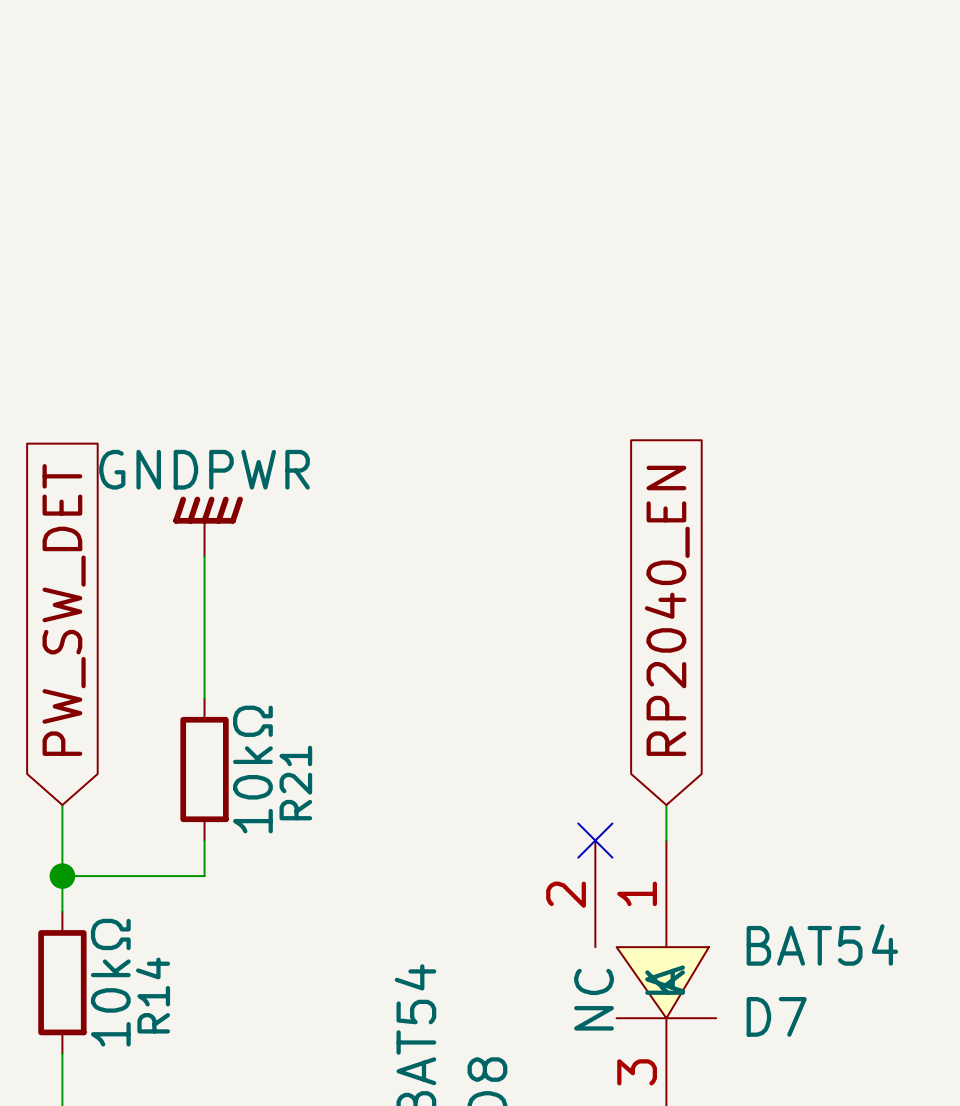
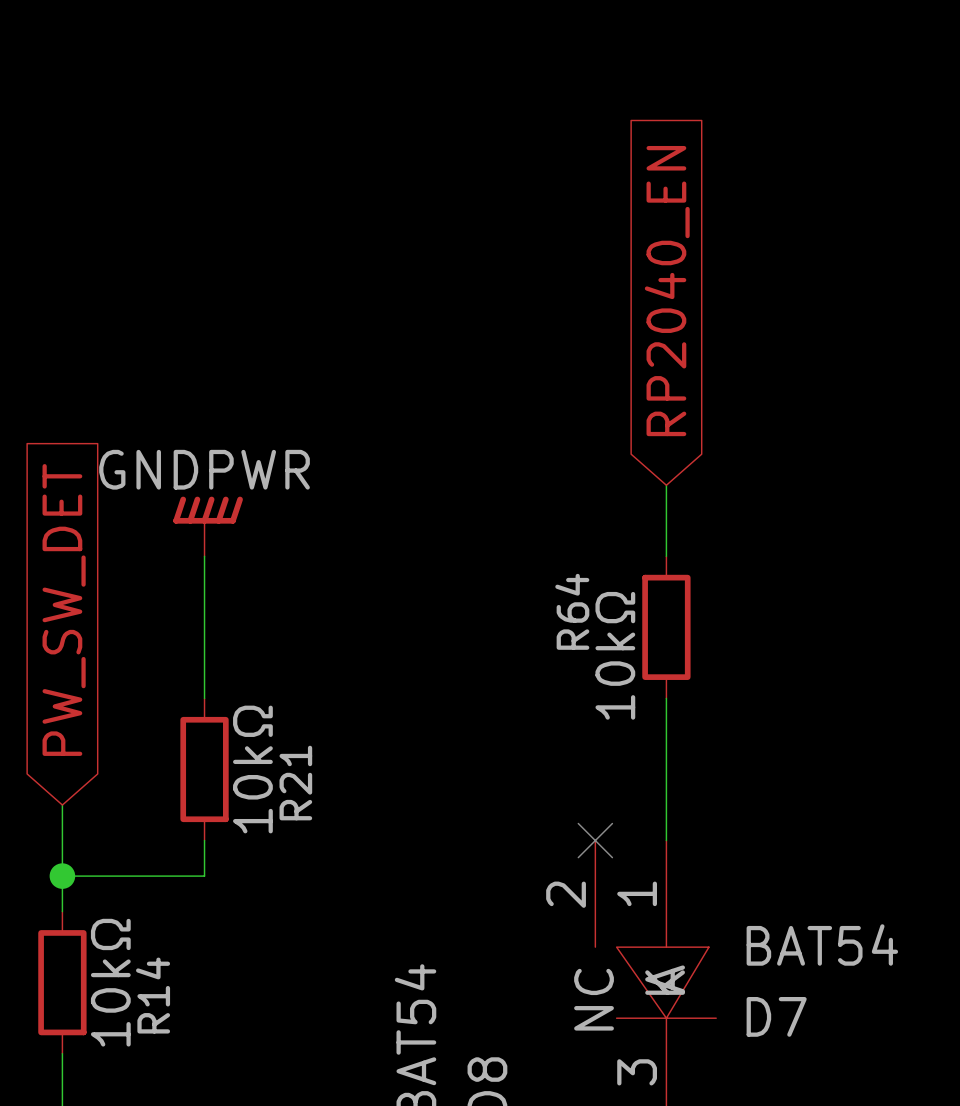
wire: none -> (666, 485) (666, 556)
global label position: RP2040_EN (667, 610) -> RP2040_EN (667, 291)
R64: none -> 10kΩ (666, 627)
wire: none -> (666, 698) (666, 805)

